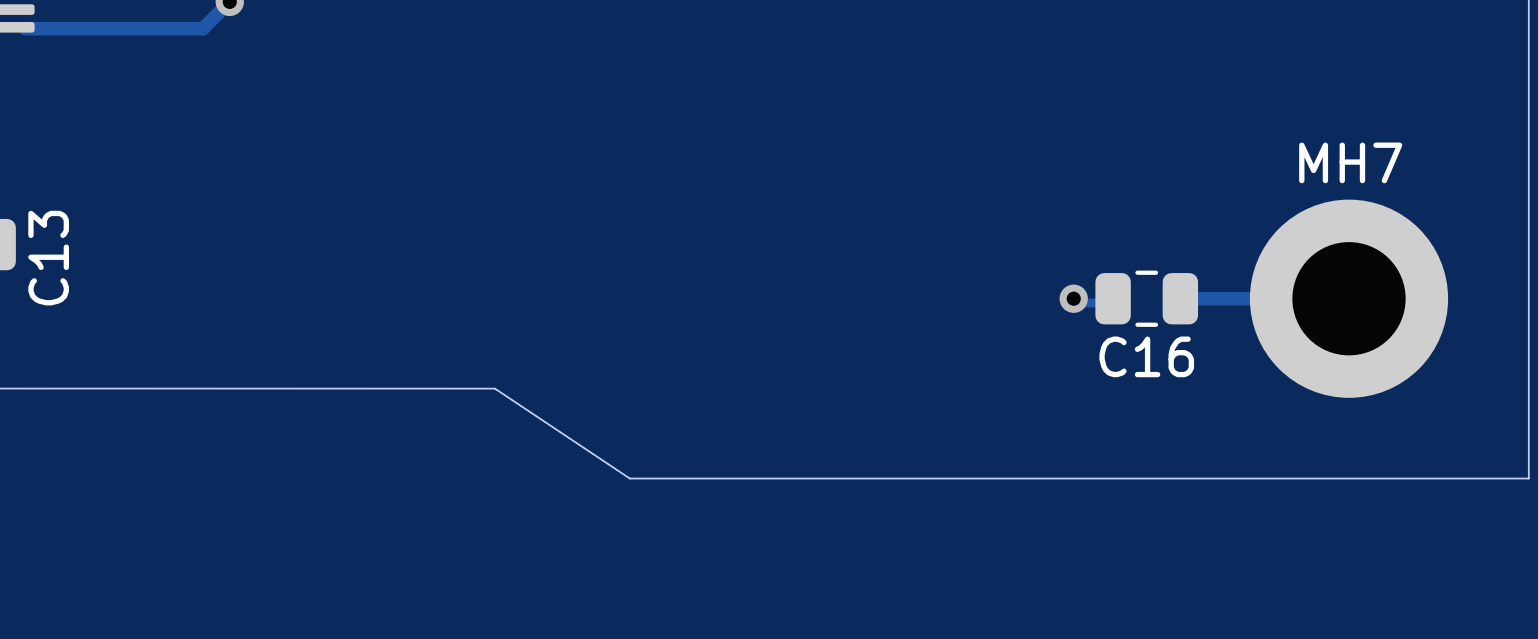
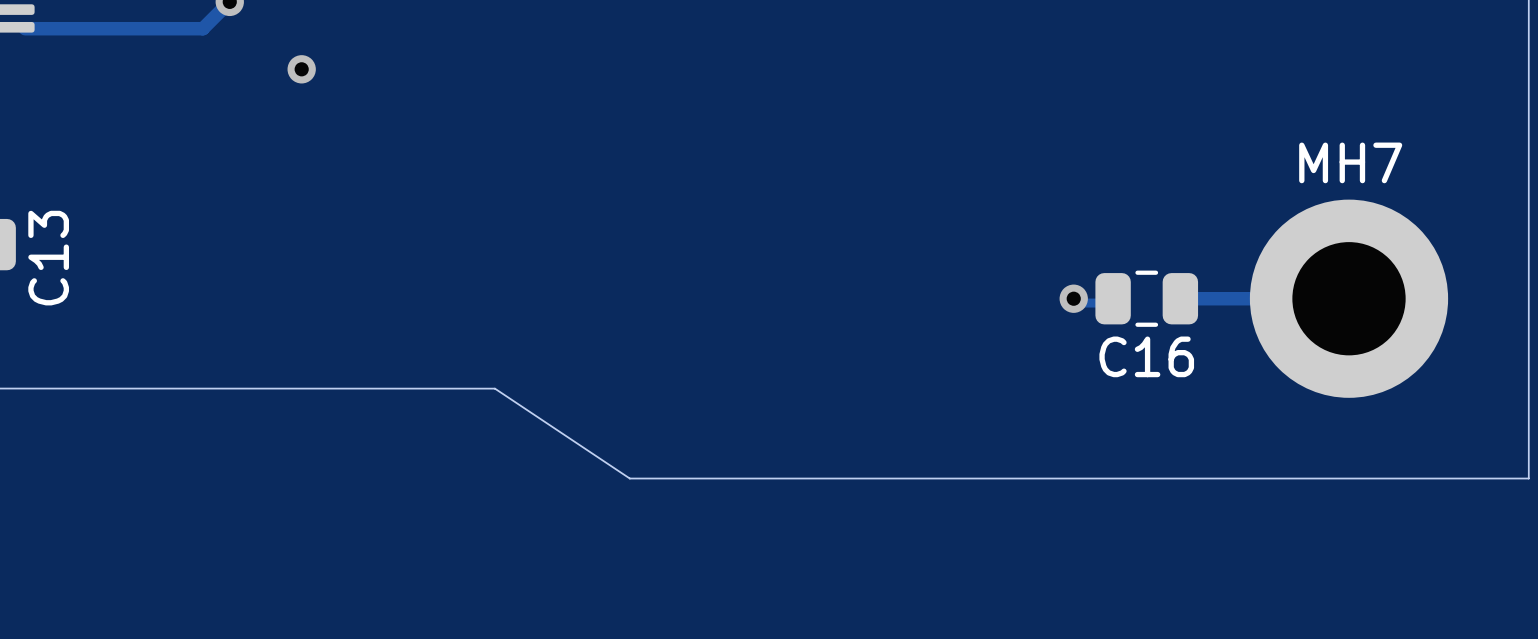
via: none -> (301, 69)

